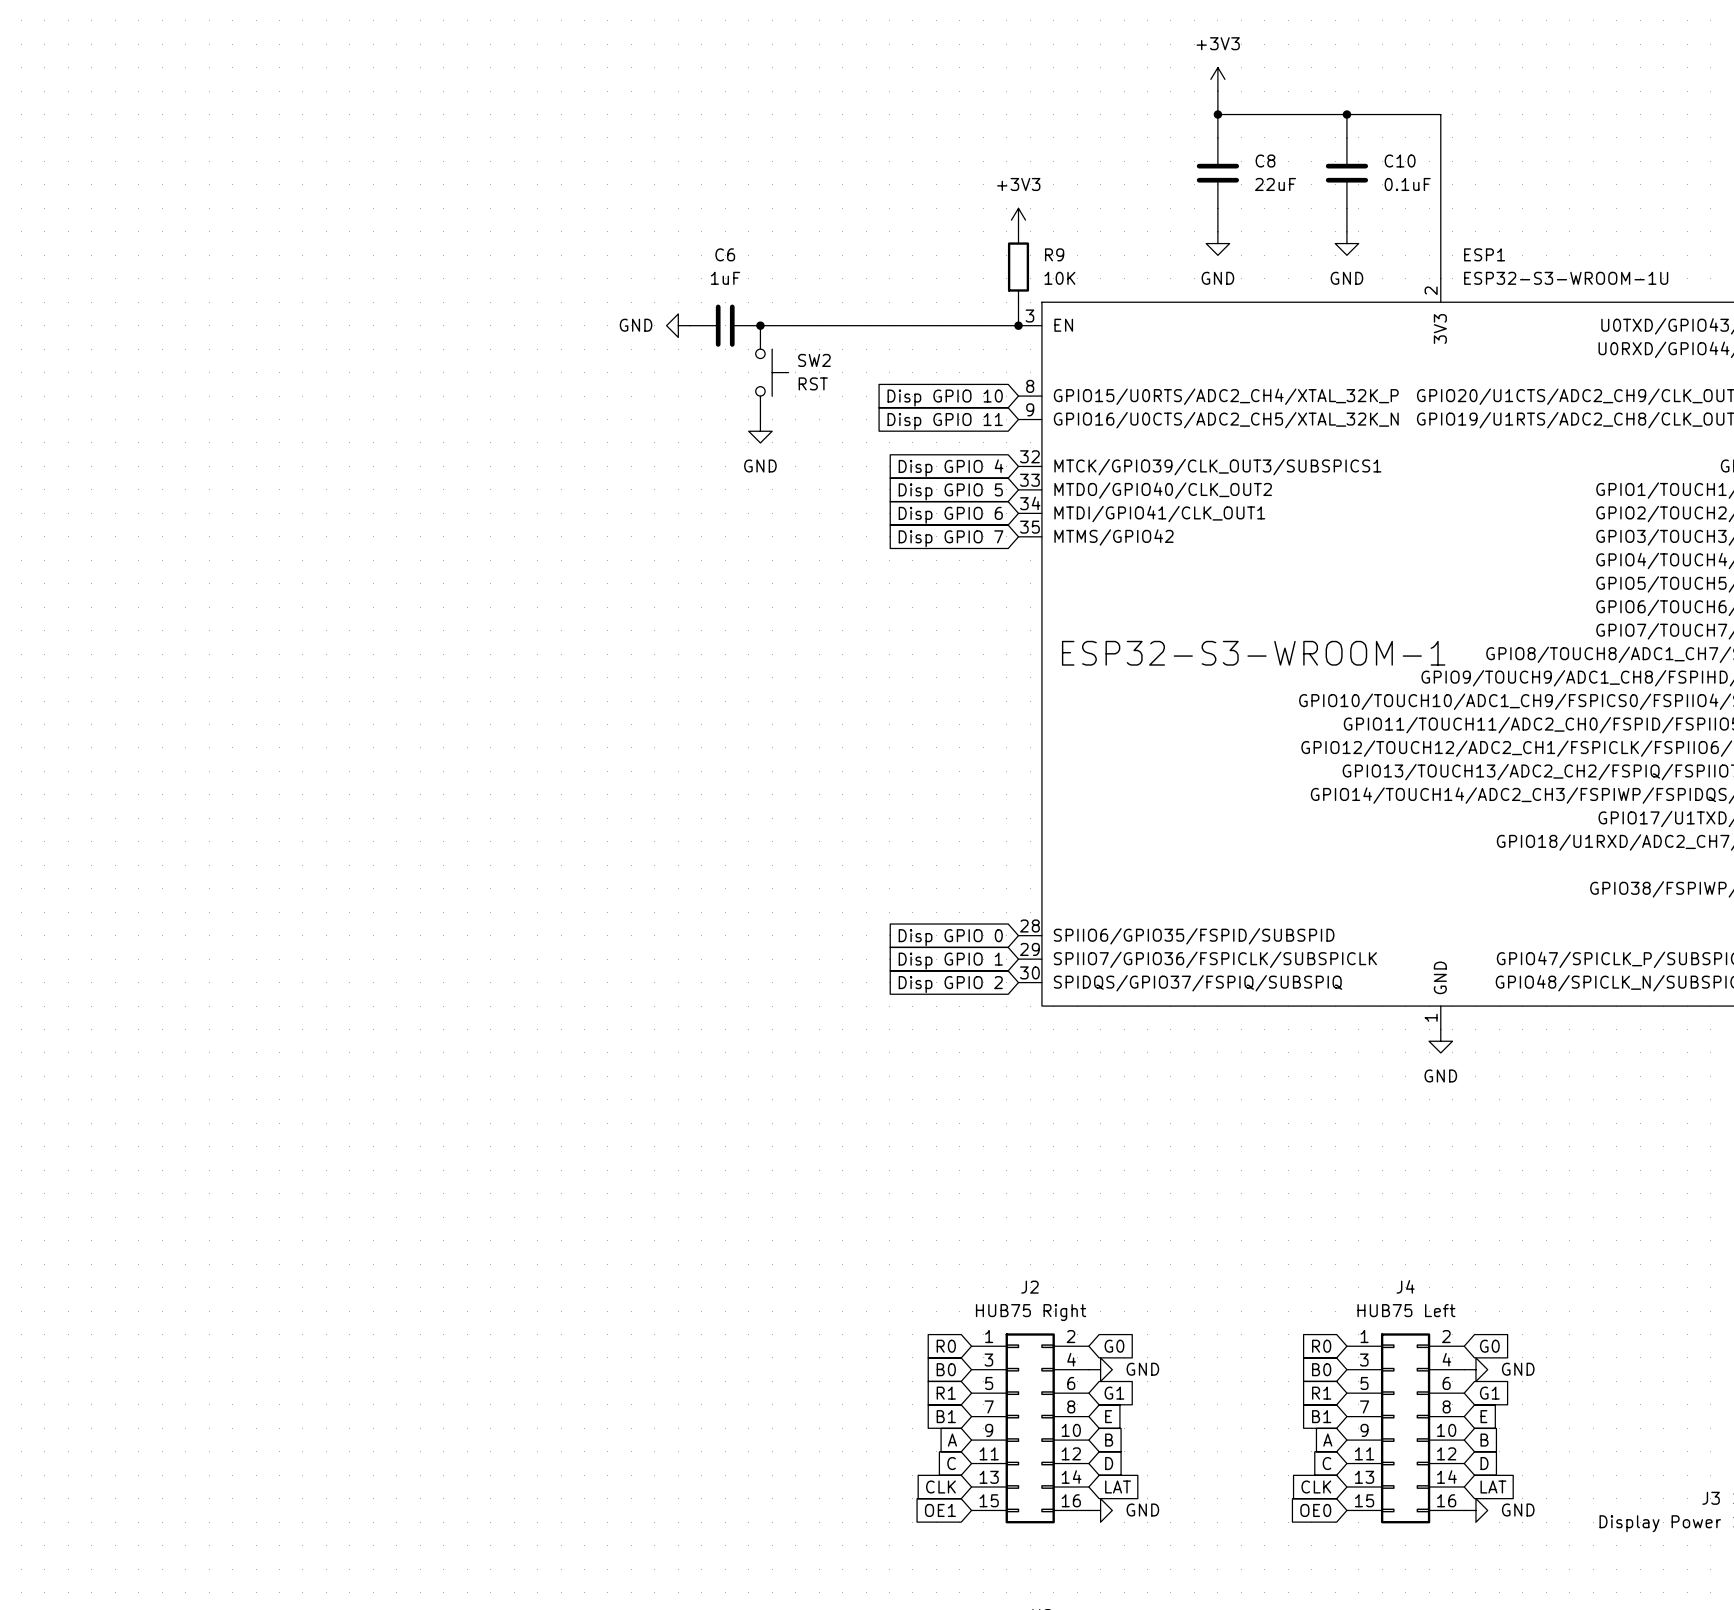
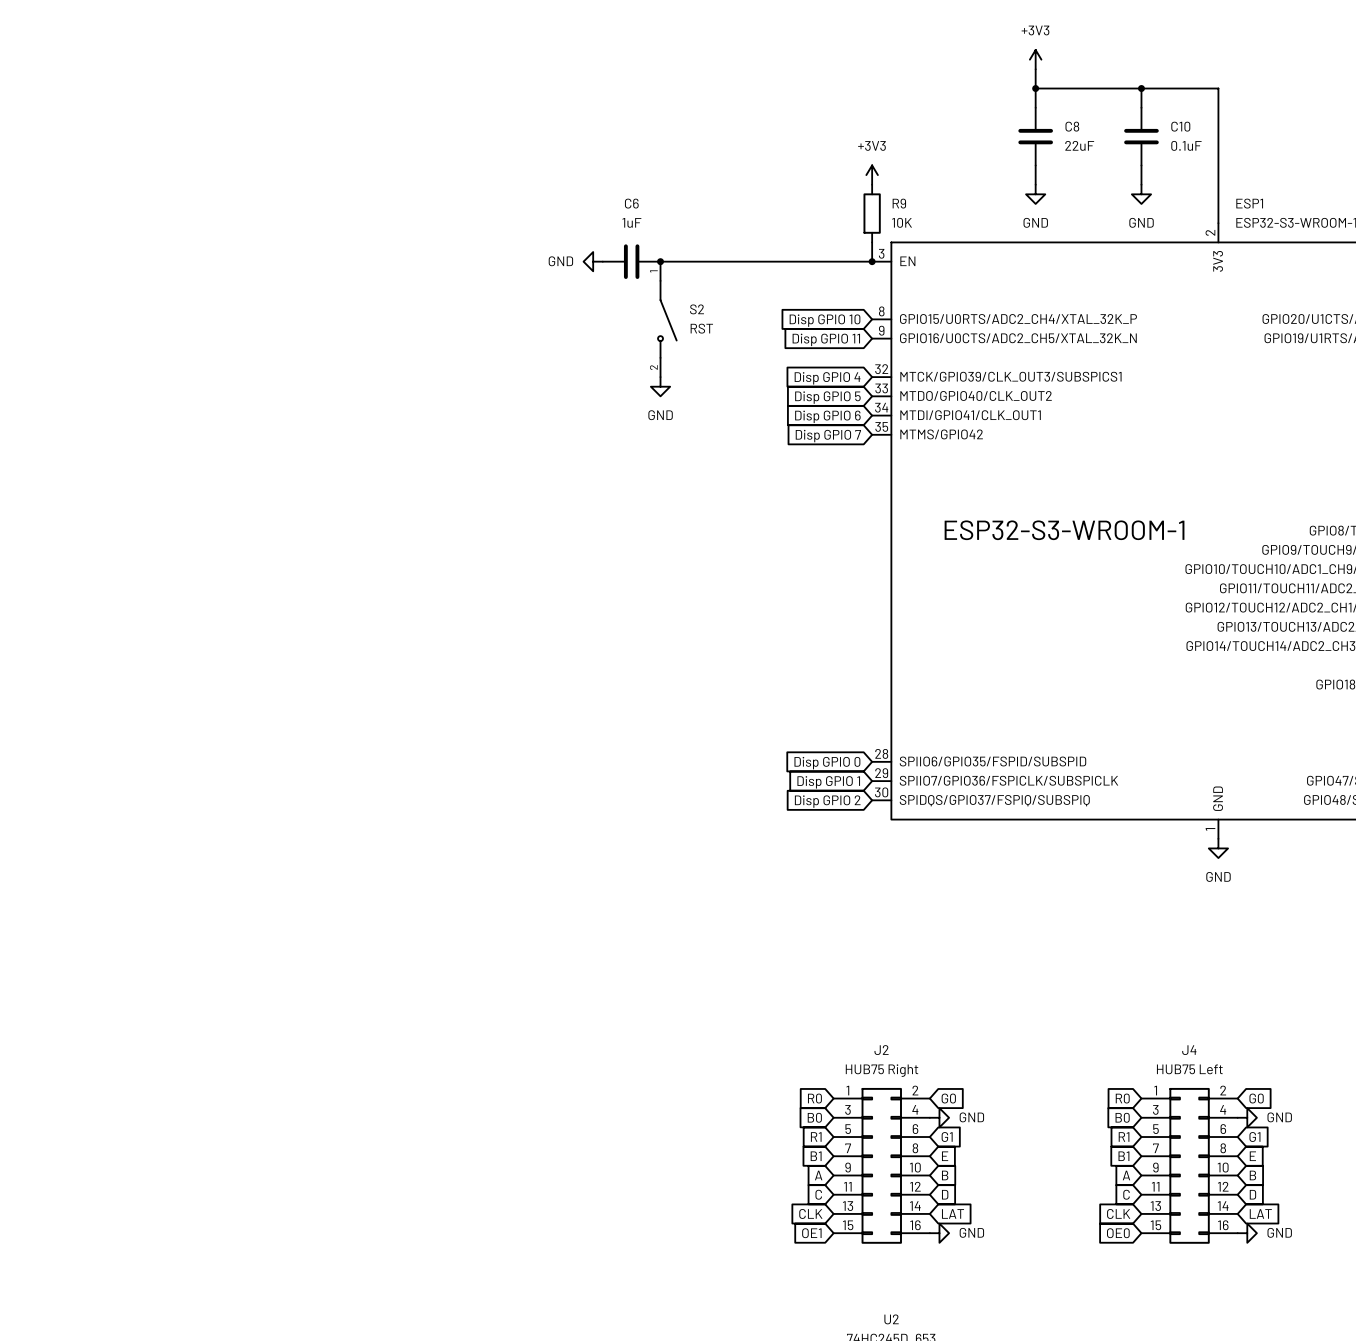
SW2: RST (772, 372) -> none
S2: none -> RST (667, 319)
power symbol position: GND (760, 431) -> GND (660, 386)

